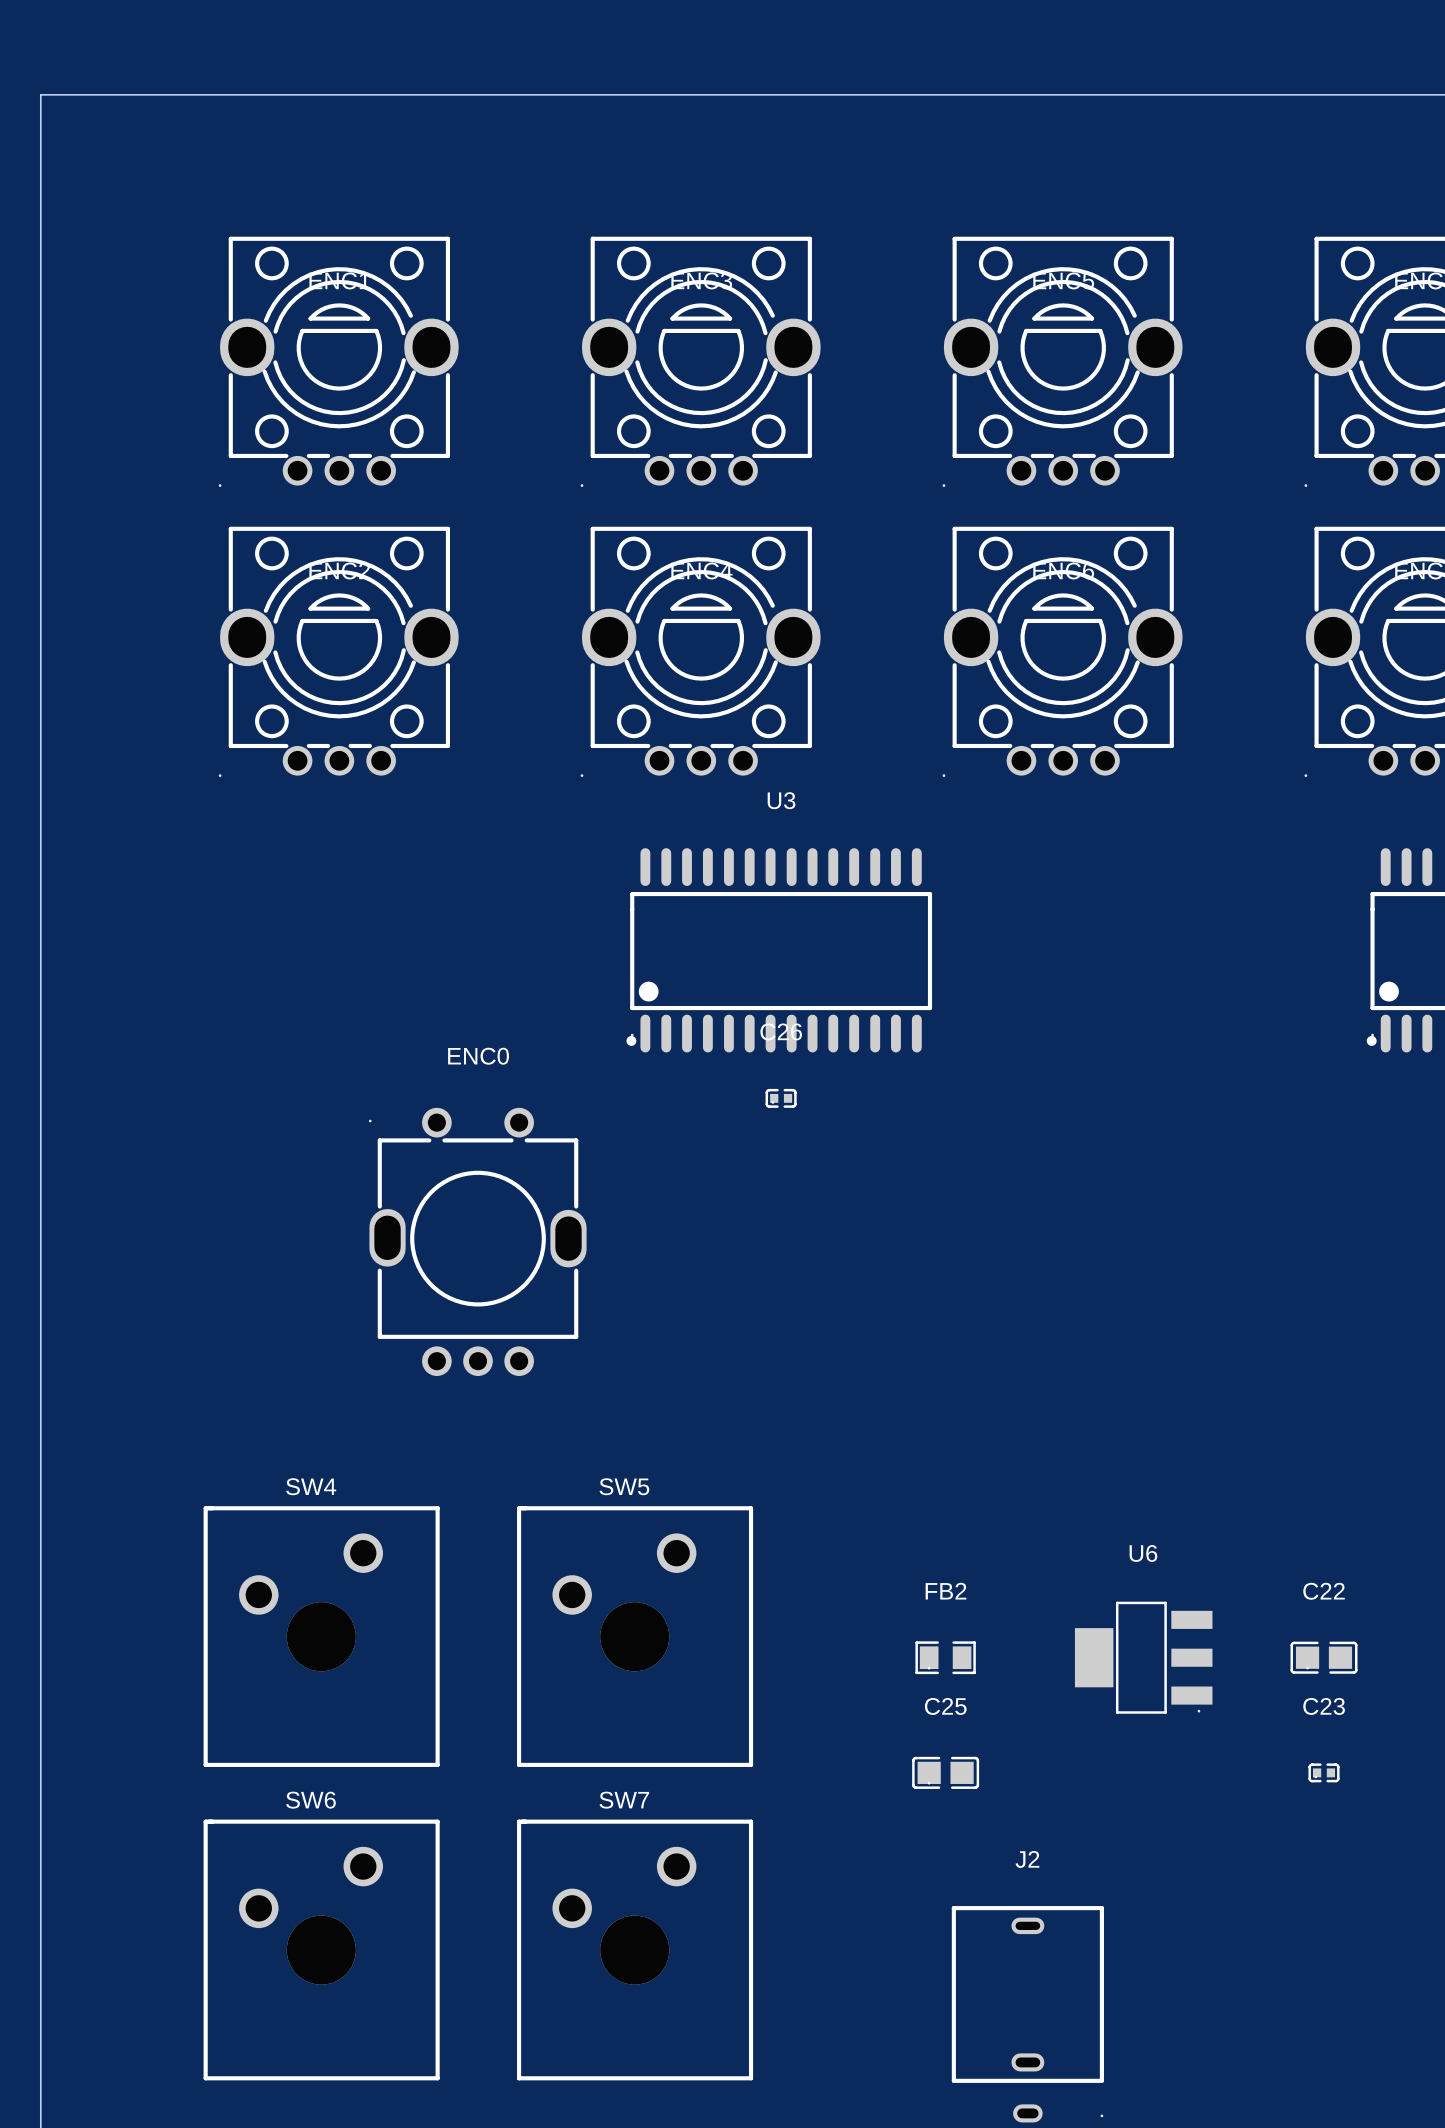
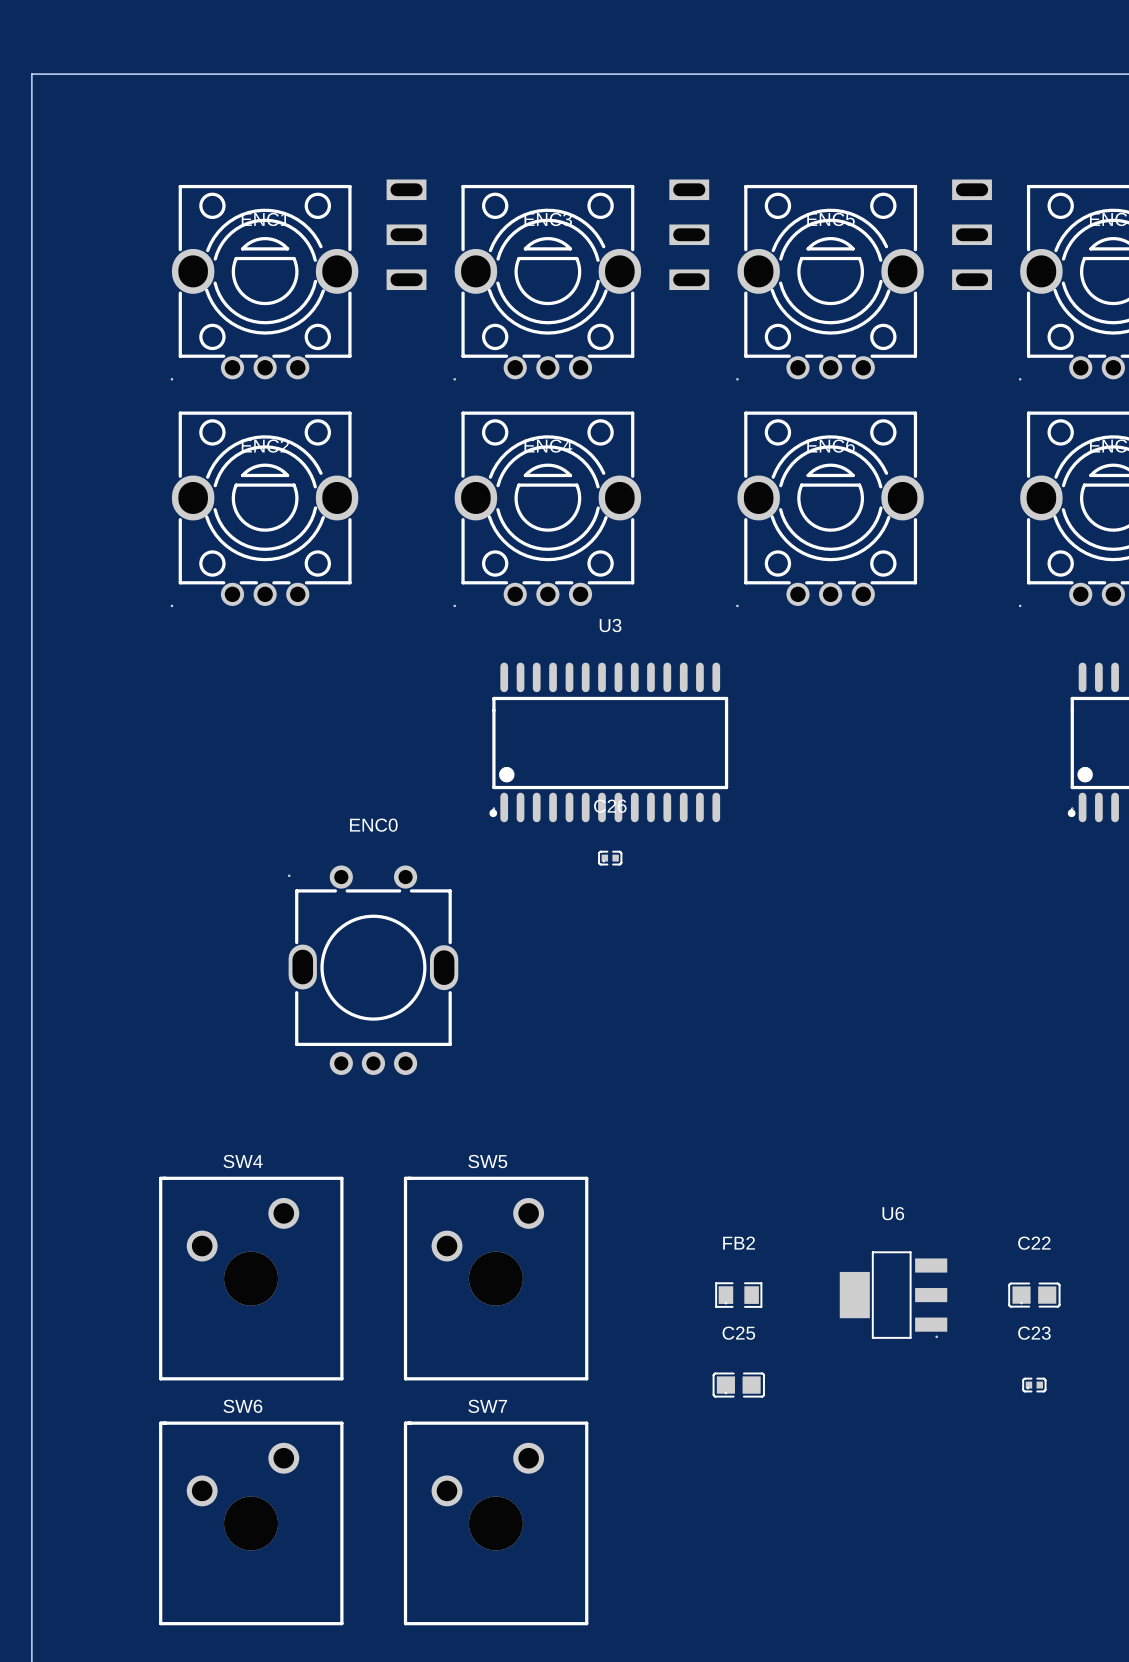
part: none -> (406, 234)
part: none -> (689, 234)
part: none -> (972, 234)
J2: (1027, 2014) -> none

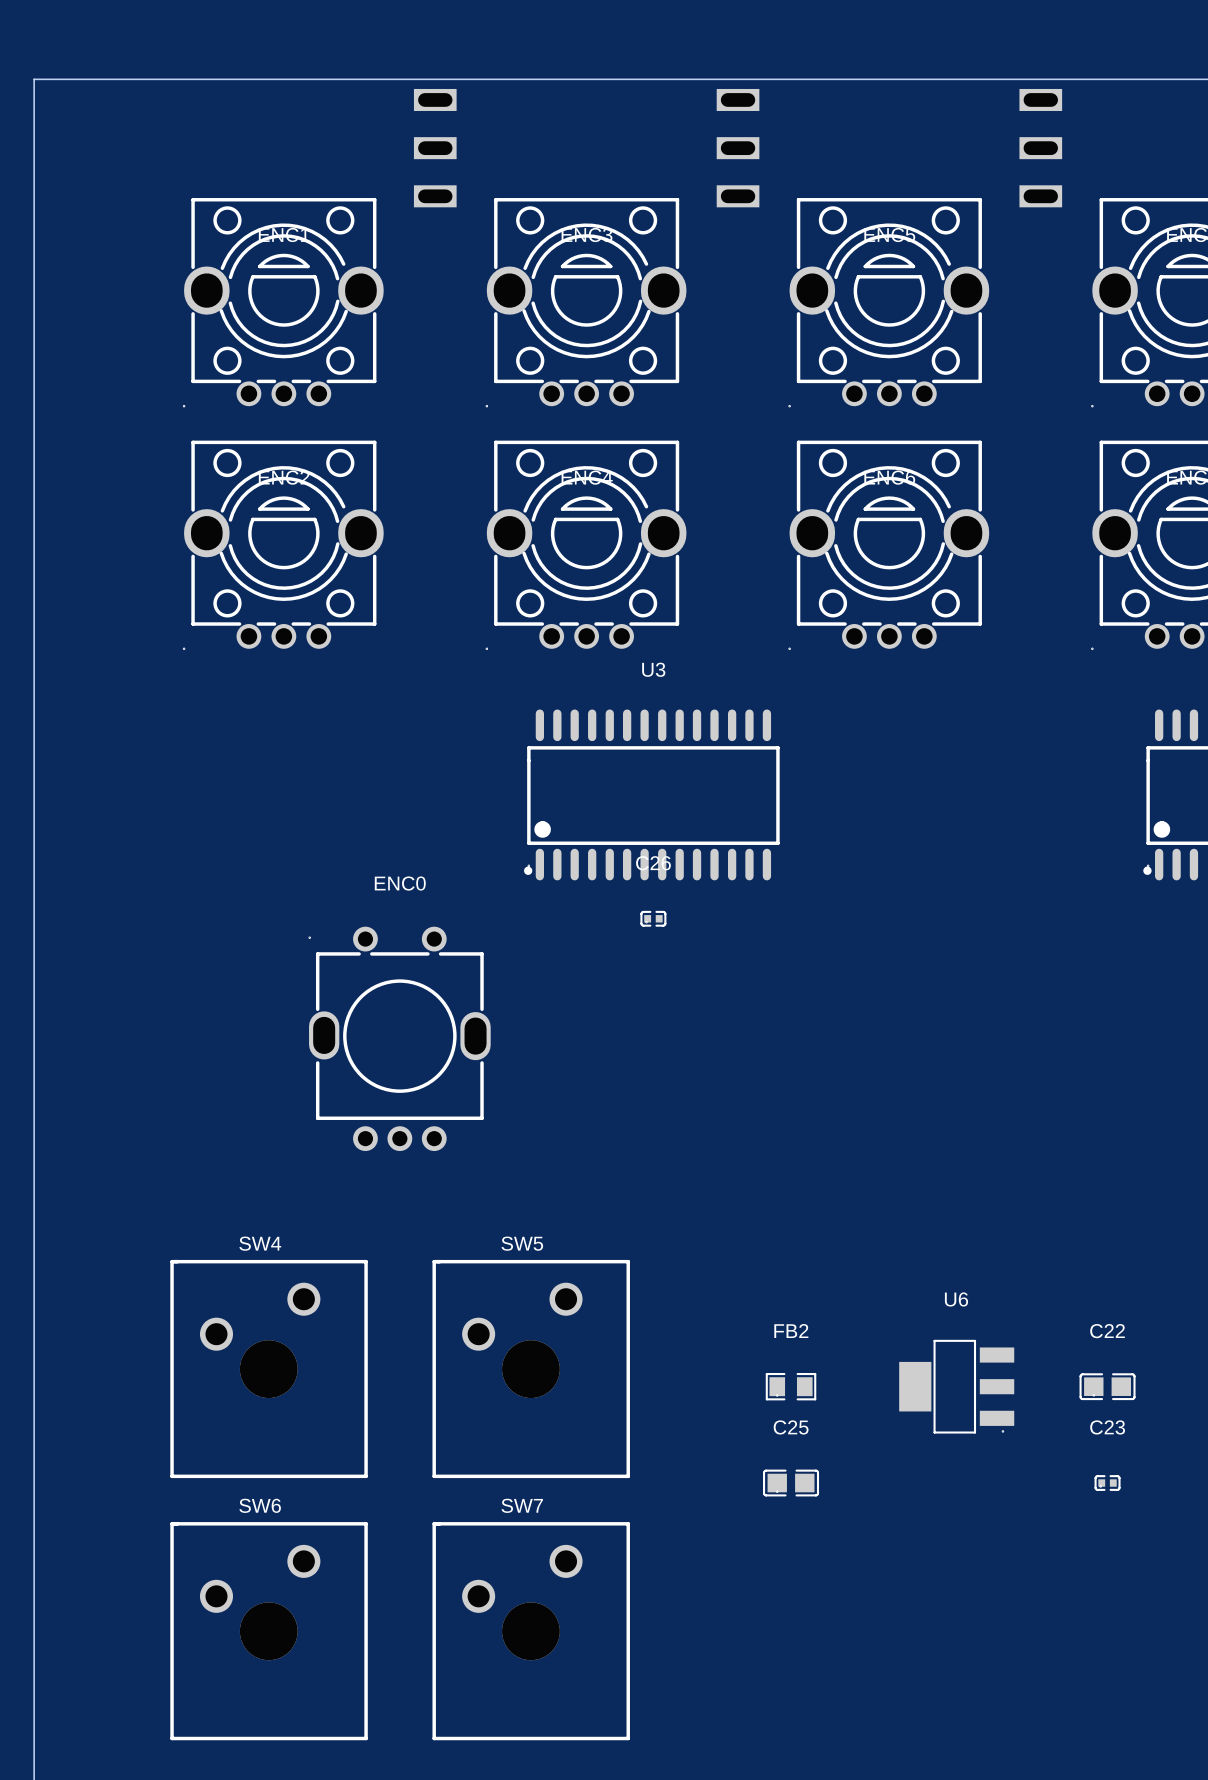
part position: (406, 234) -> (435, 148)
part position: (689, 234) -> (738, 148)
part position: (972, 234) -> (1040, 148)

